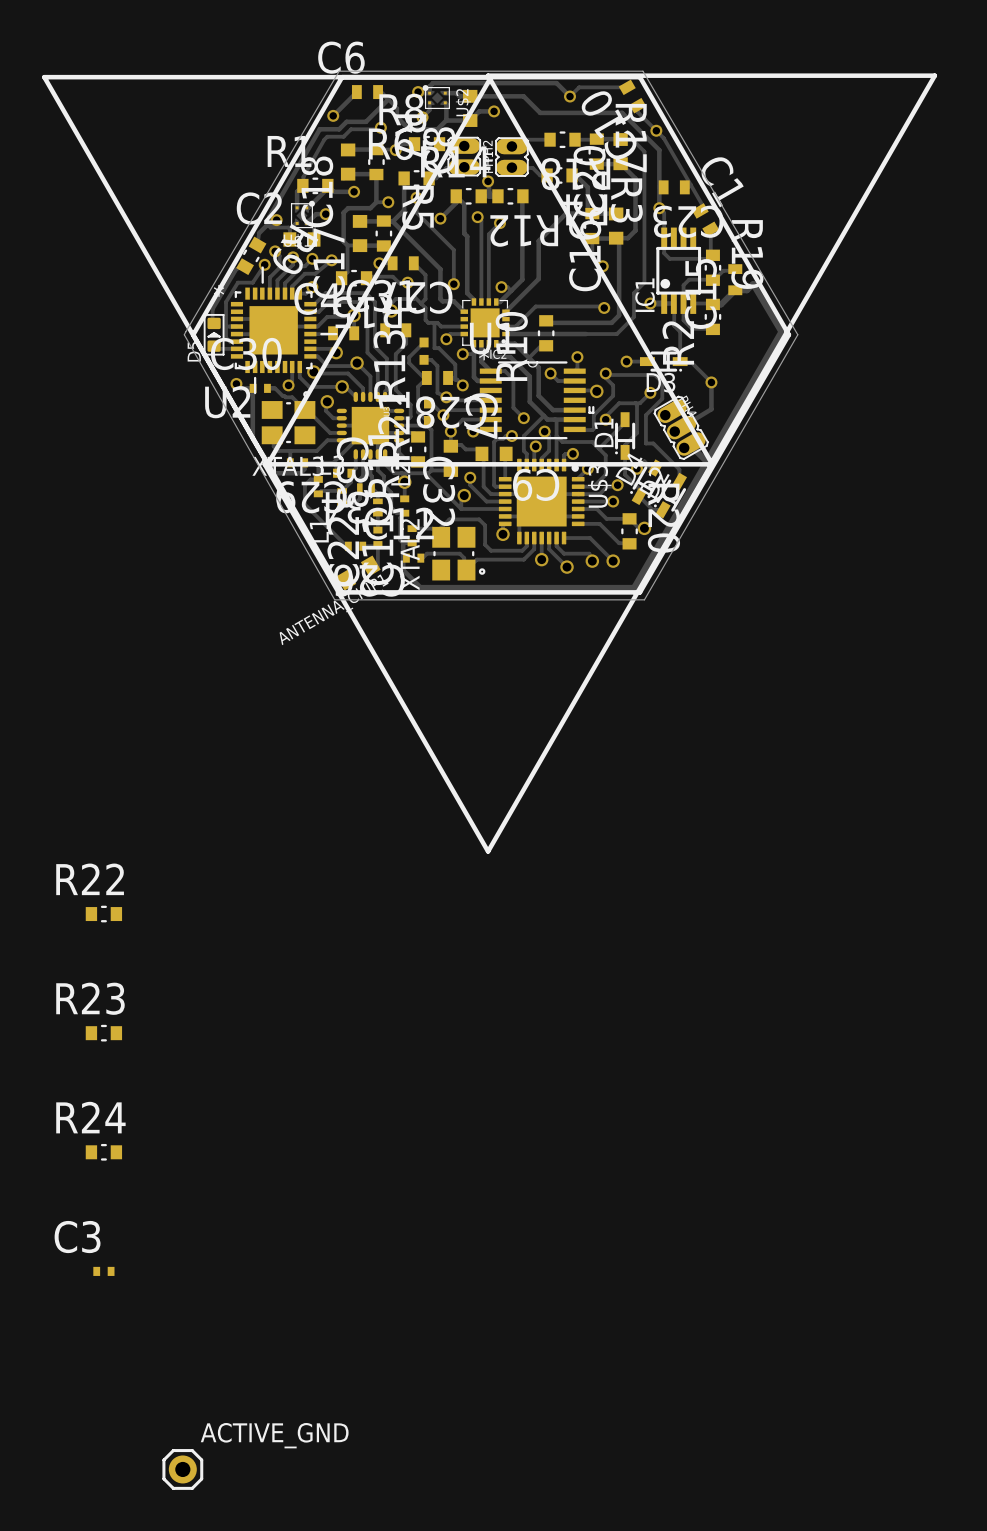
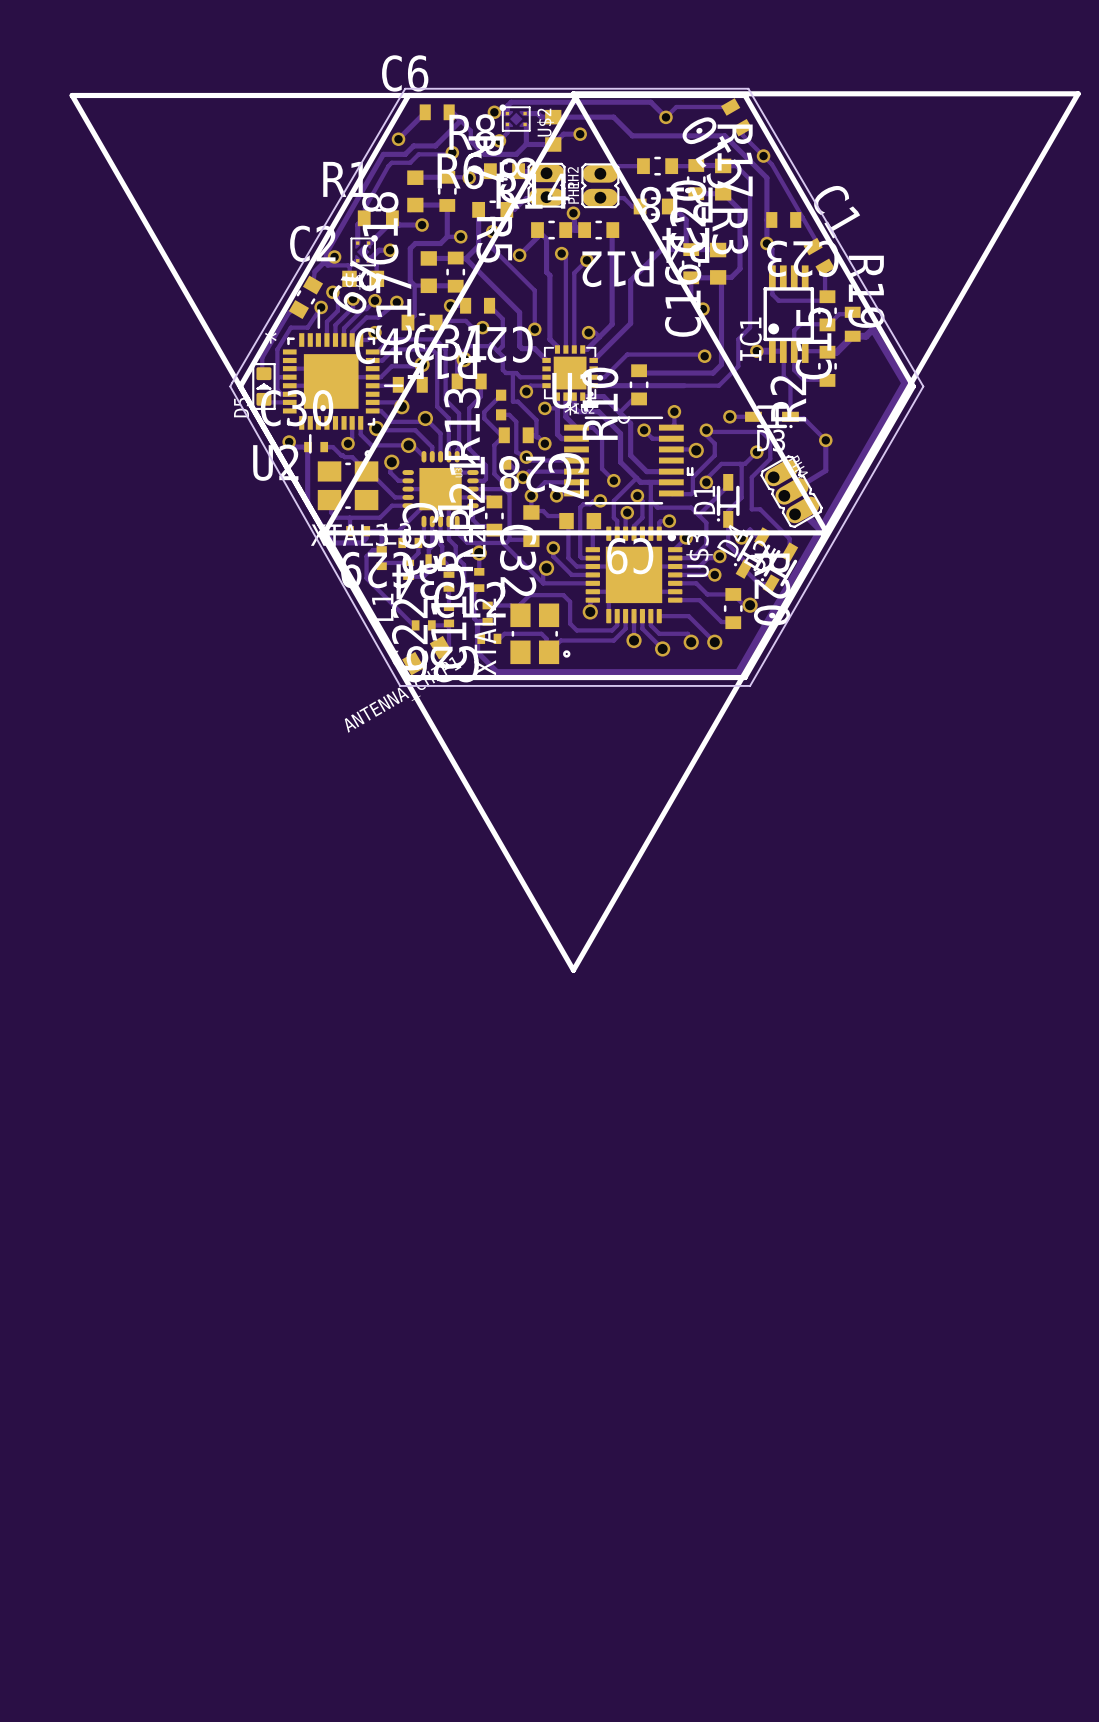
R22: (103, 914) -> none
R23: (103, 1033) -> none
R24: (103, 1152) -> none
C3: (103, 1271) -> none
ACTIVE_GND: (182, 1469) -> none

